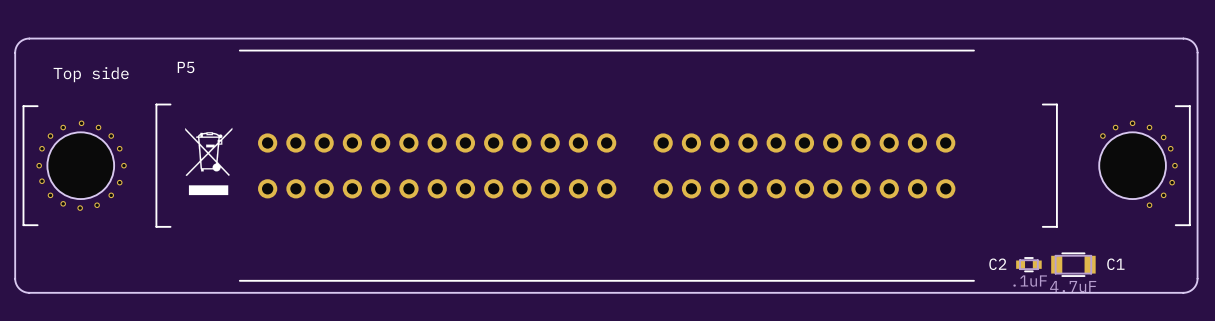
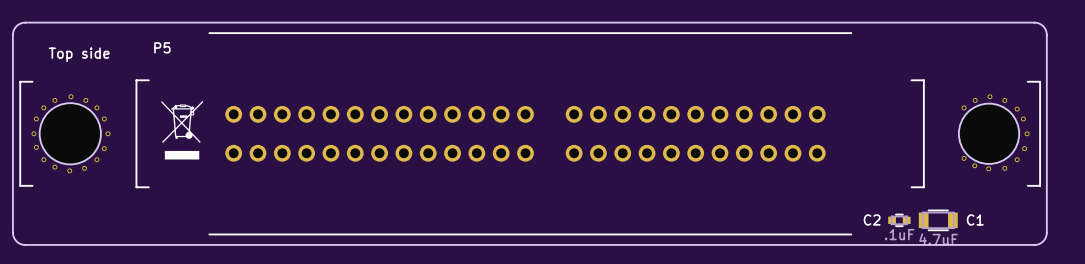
P5 footprint: [22, 49, 1191, 282] -> [19, 32, 1041, 236]
part: none -> (964, 158)
part: none -> (974, 165)
part: none -> (988, 168)

